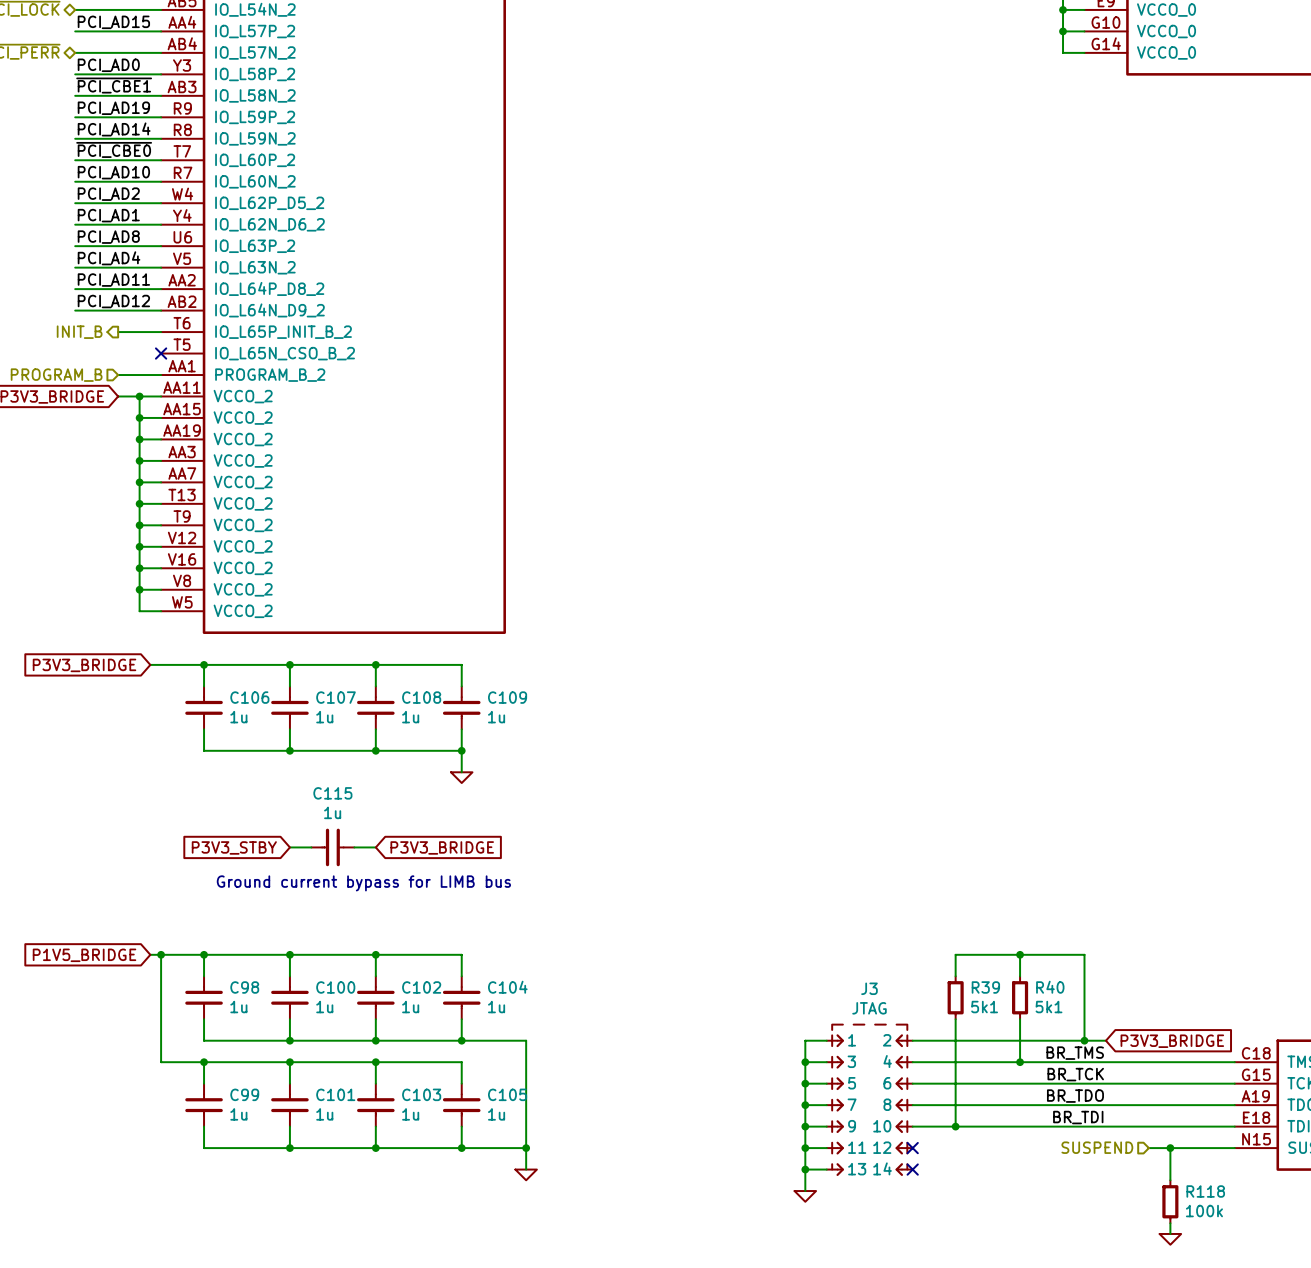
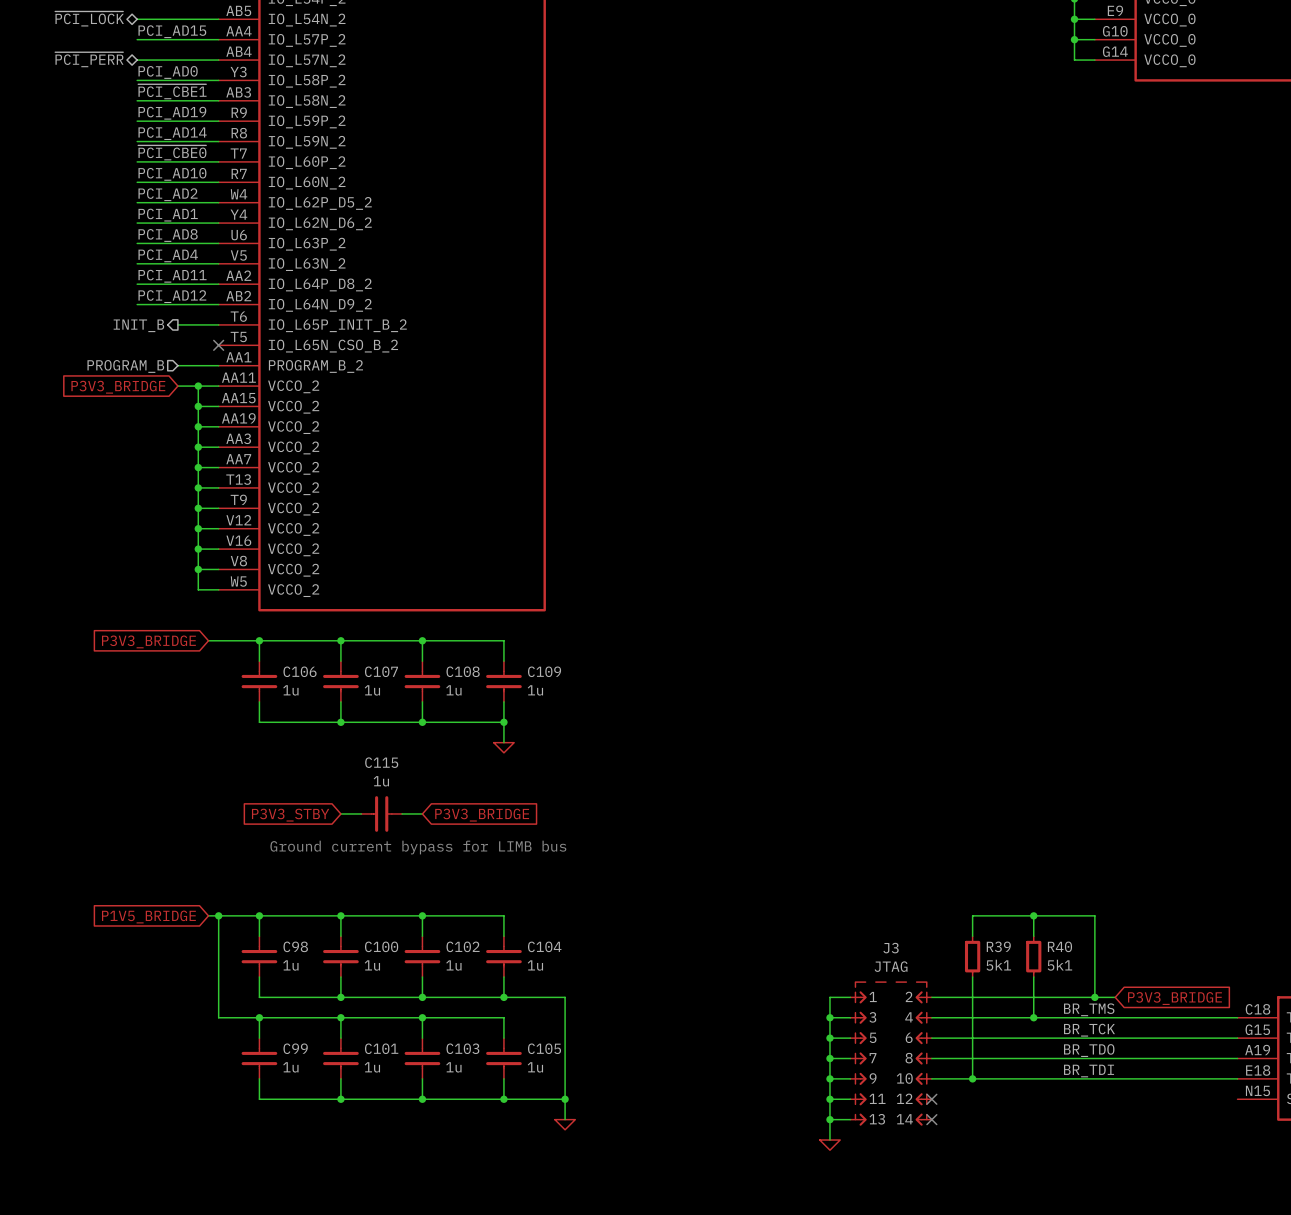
hierarchical label: SUSPEND (1097, 1147) -> none
wire: (1148, 1148) (1234, 1148) -> none
wire: (1170, 1148) (1170, 1180) -> none
junction: (1170, 1148) -> none
R118: 100k (1170, 1201) -> none
wire: (1170, 1223) (1170, 1233) -> none
power symbol: (1170, 1239) -> none

